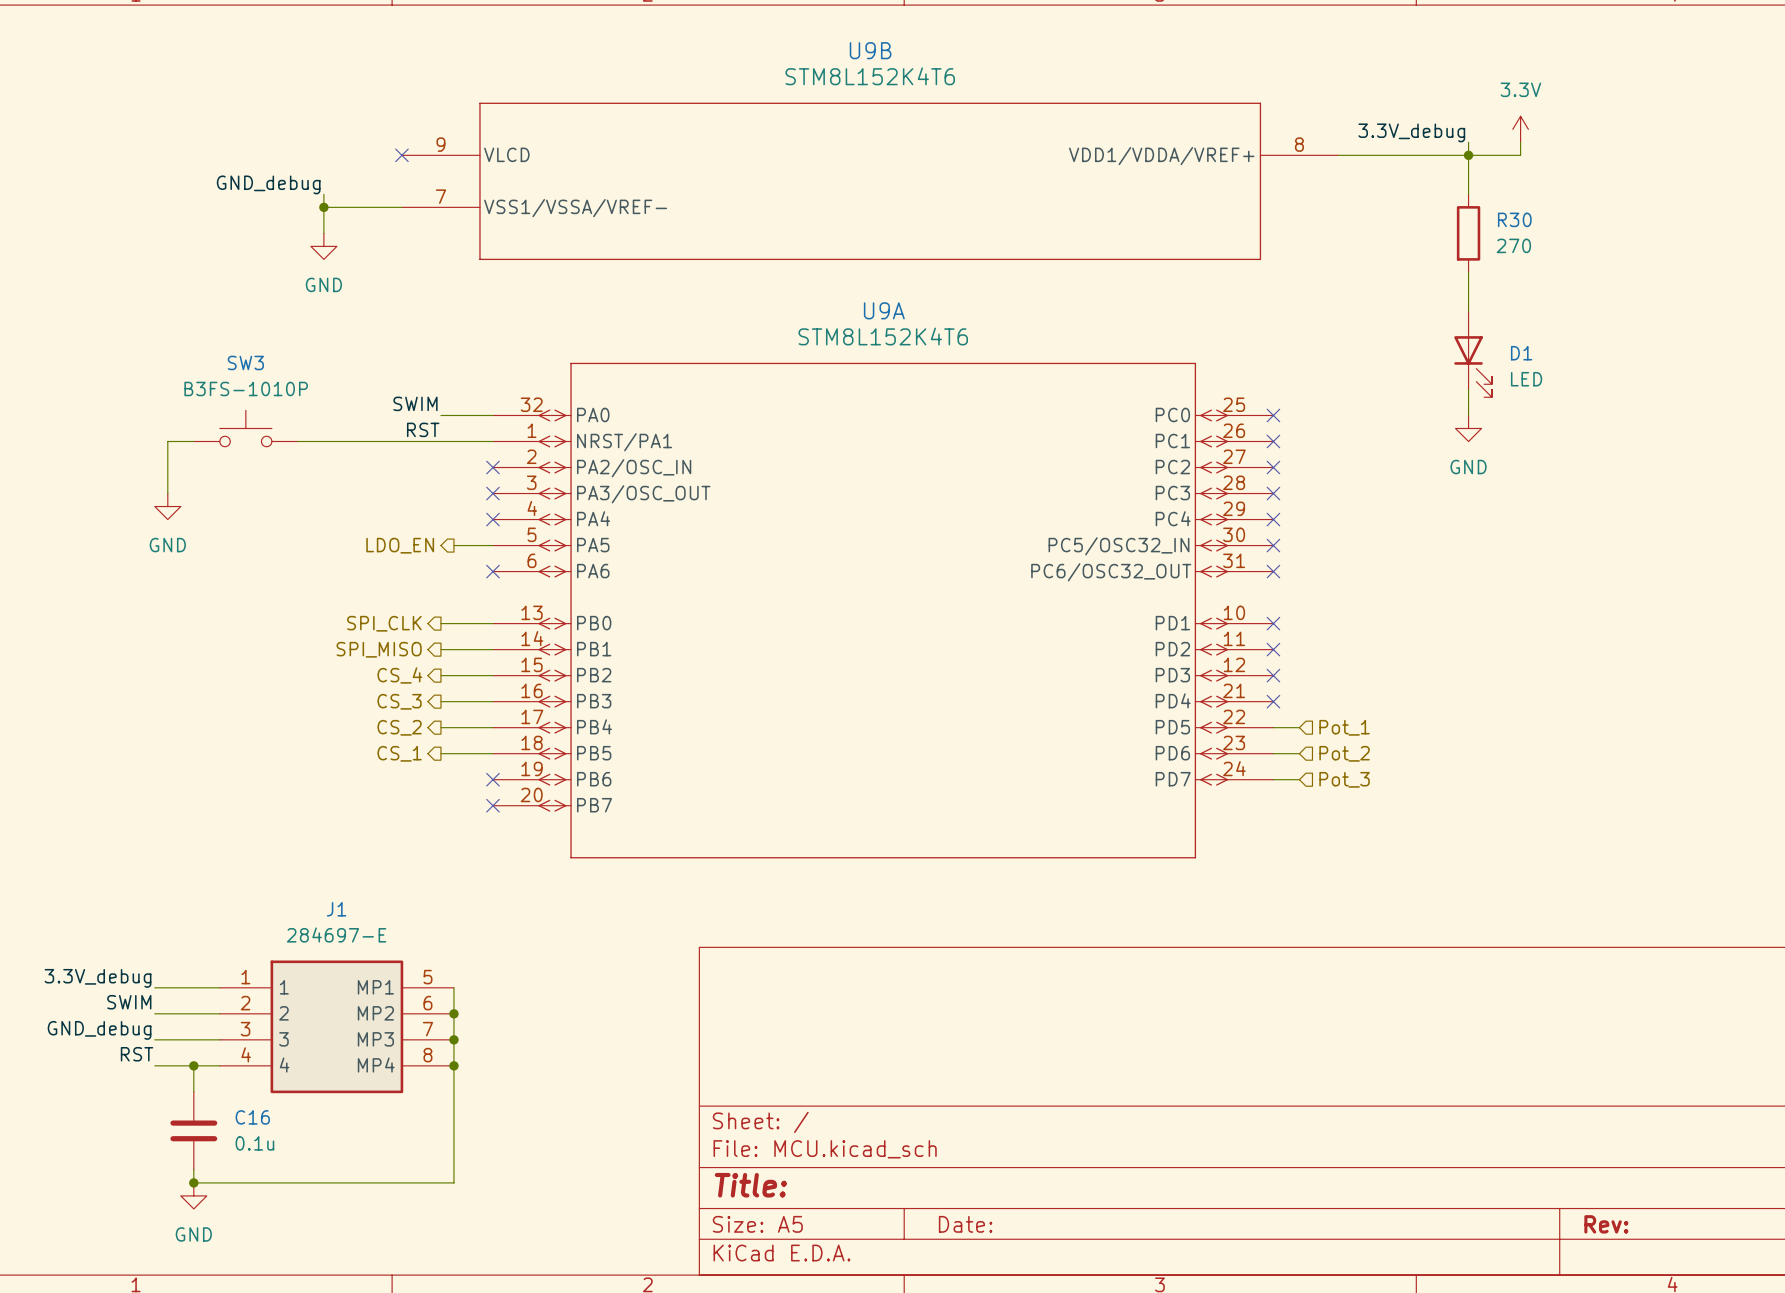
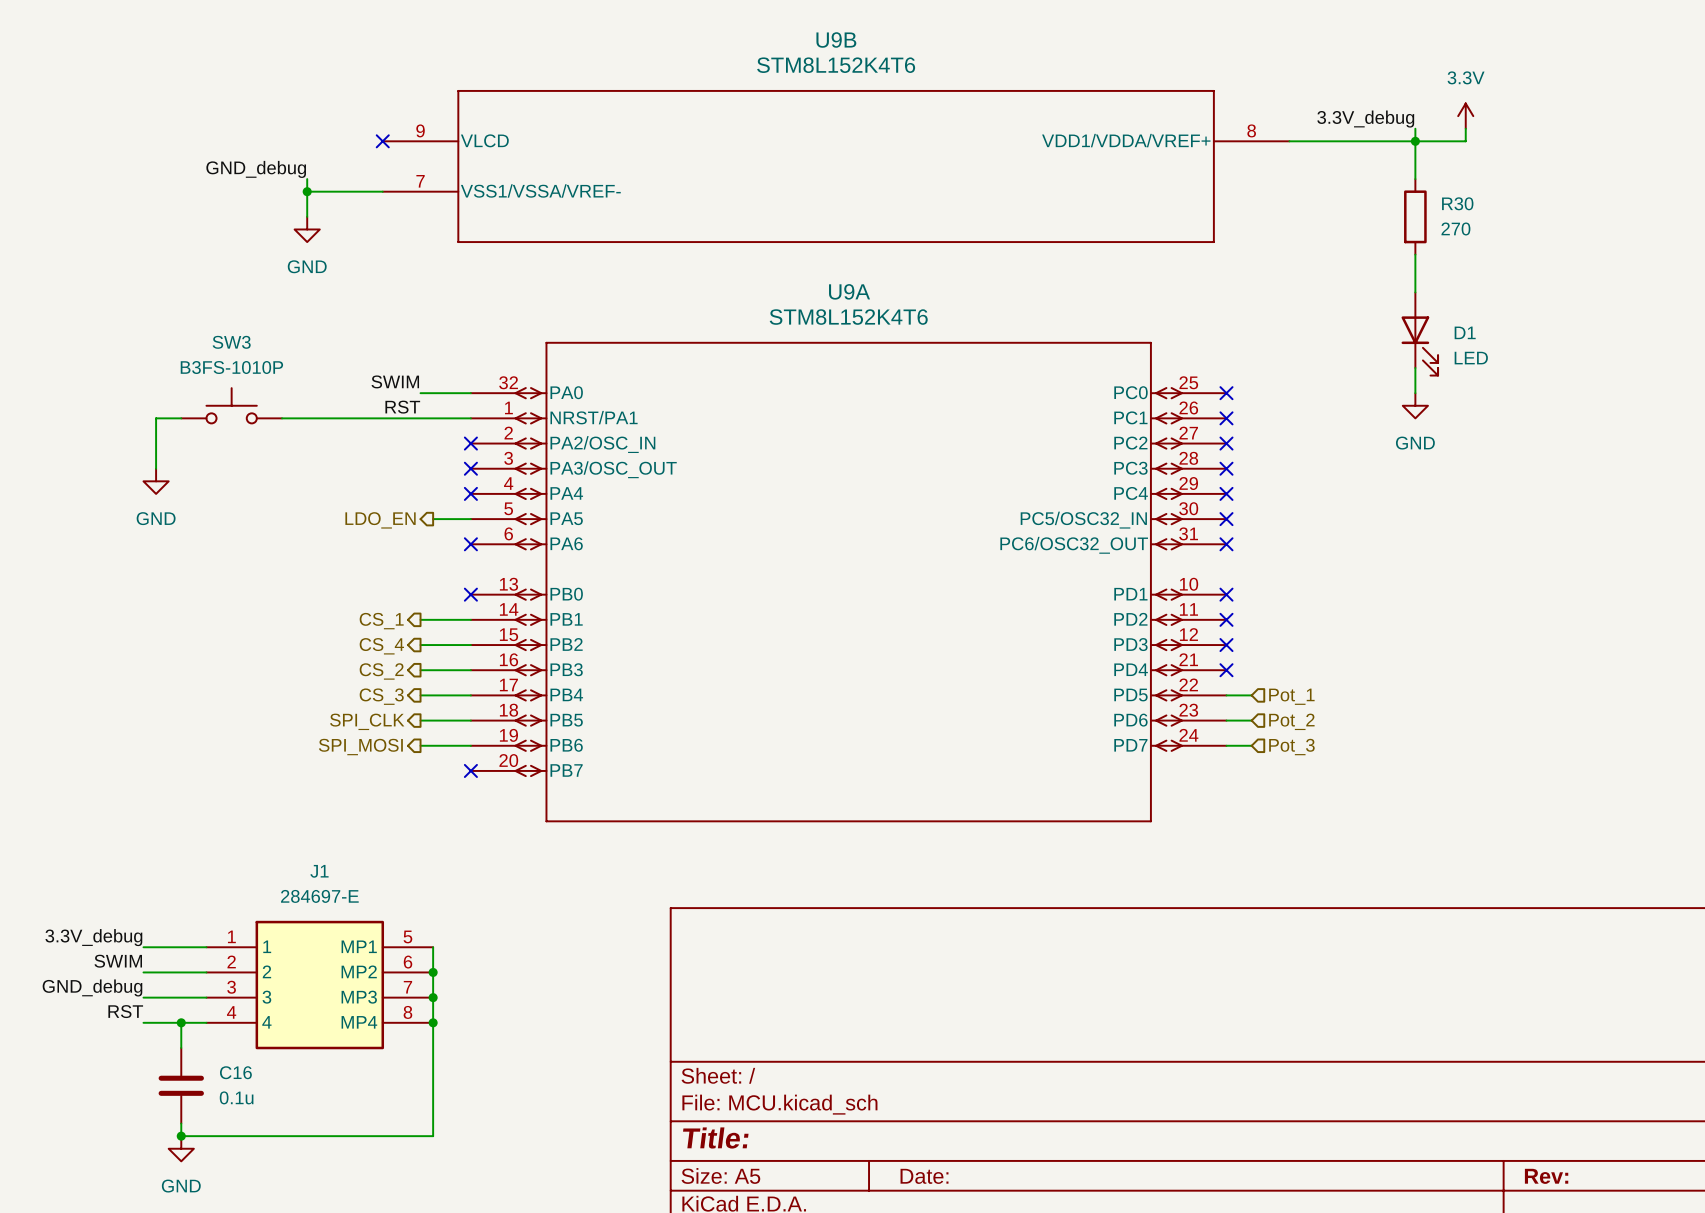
hierarchical label: SPI_CLK (384, 623) -> none
wire: (440, 623) (492, 623) -> (420, 745) (470, 745)
no-connect mark: none -> (470, 594)
hierarchical label: SPI_MISO (379, 649) -> CS_1 (381, 621)
hierarchical label: CS_3 (399, 701) -> CS_2 (381, 671)
hierarchical label: CS_2 (399, 727) -> CS_3 (381, 696)
hierarchical label: CS_1 (399, 753) -> SPI_CLK (367, 721)
hierarchical label: none -> SPI_MOSI (360, 747)
no-connect mark: (492, 779) -> none

